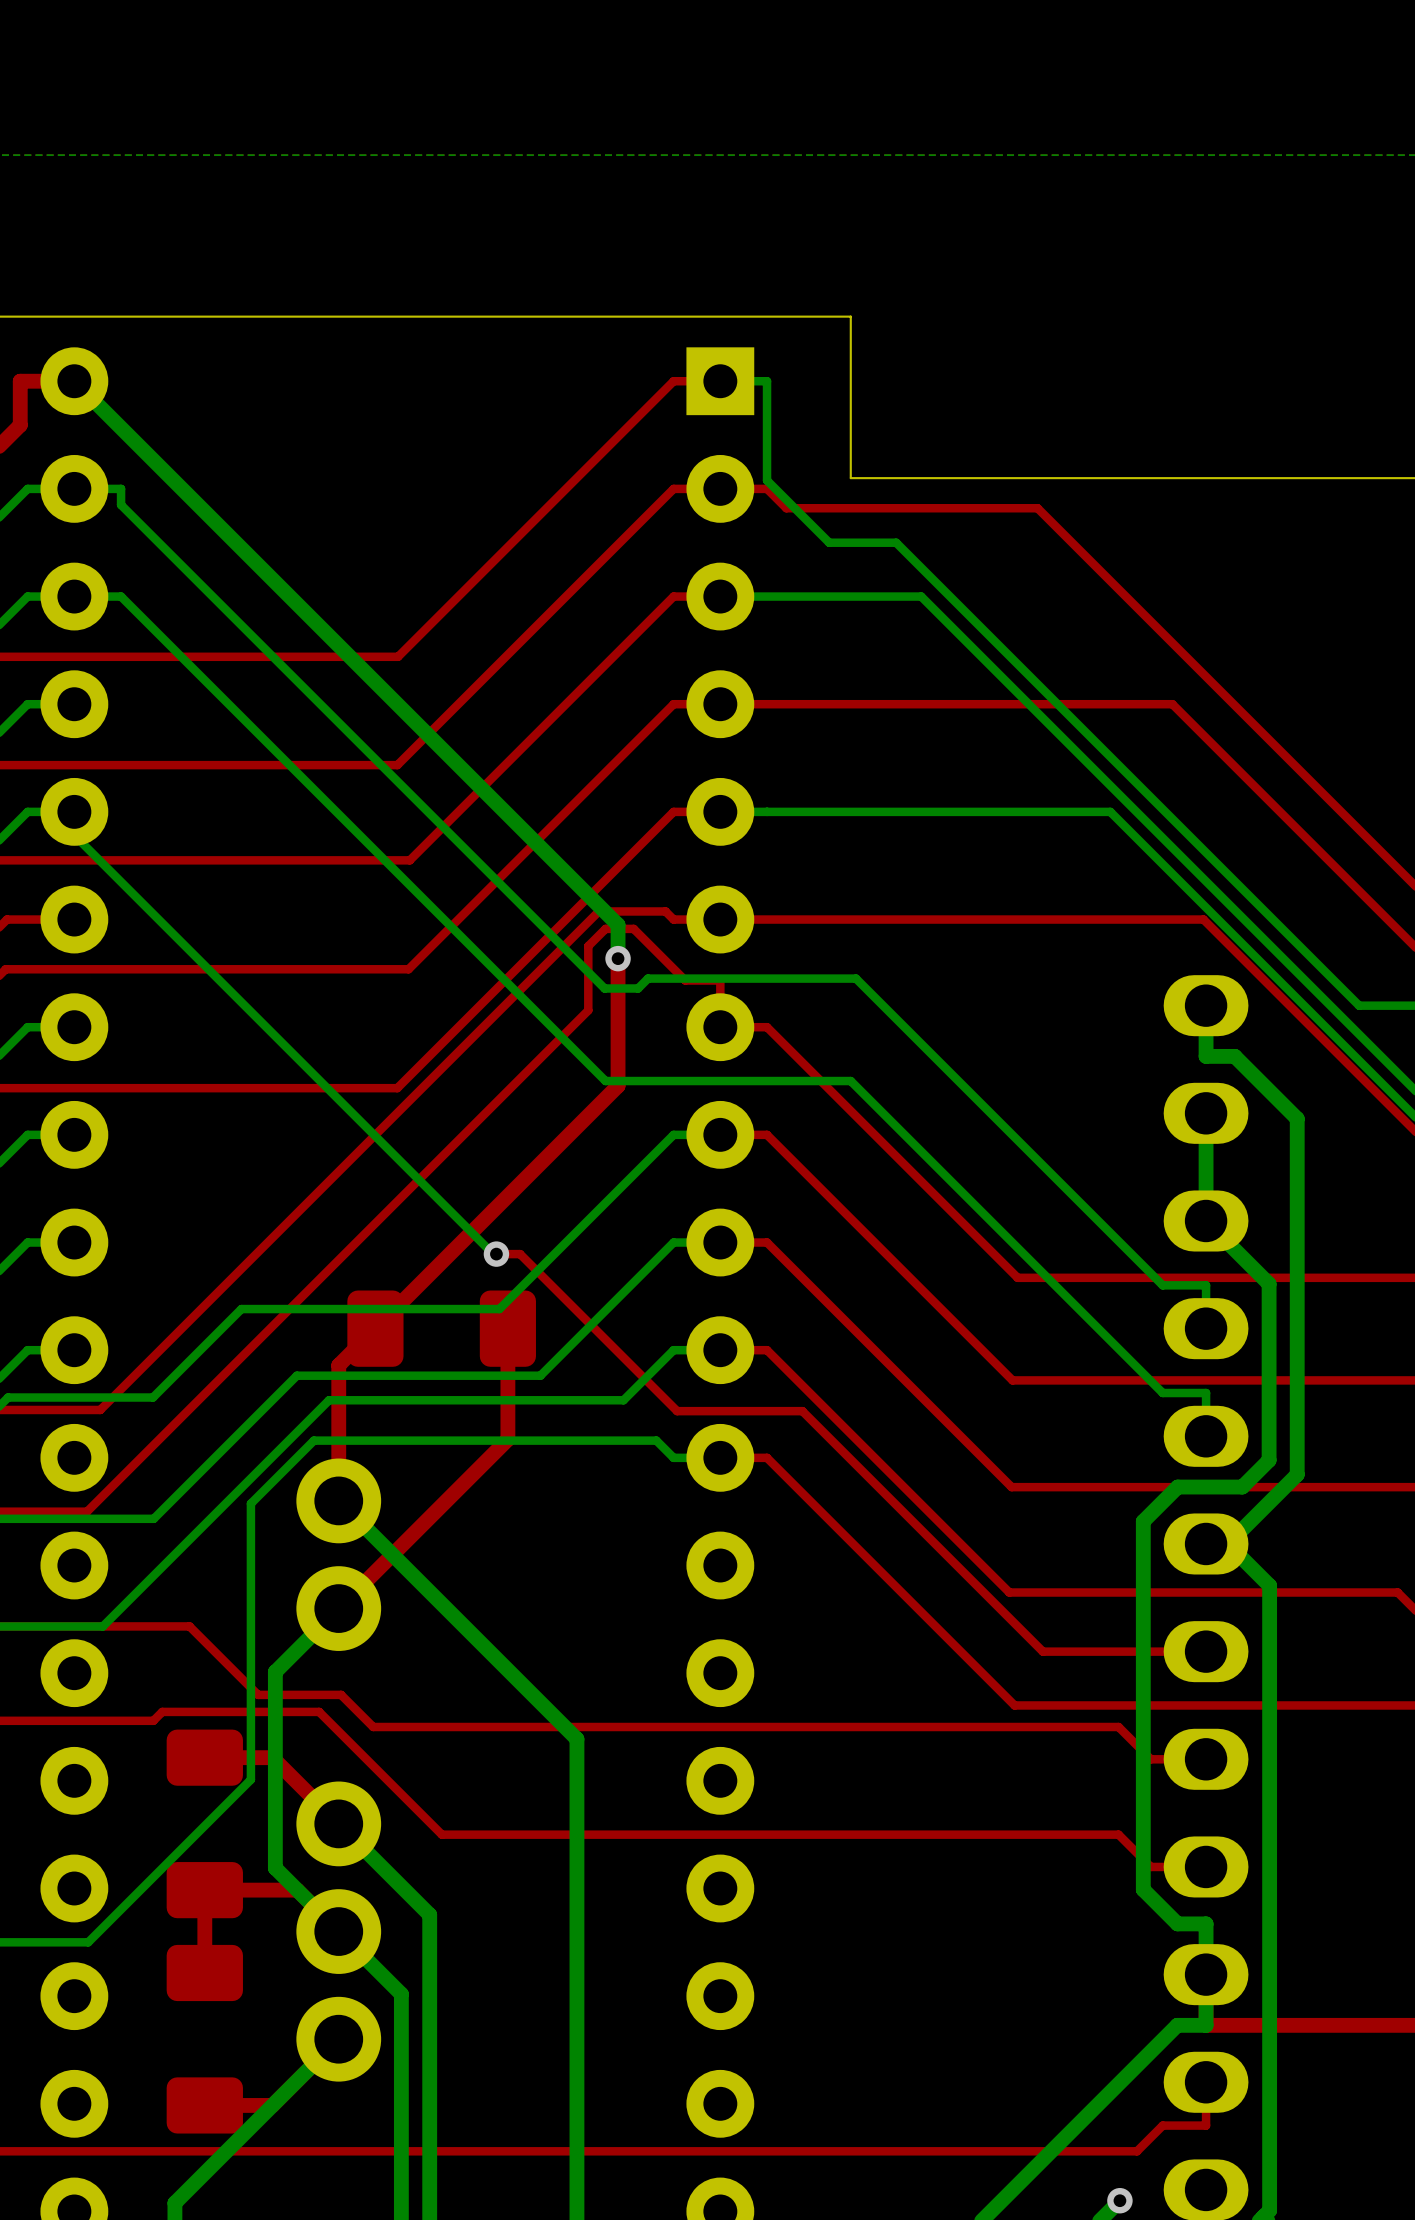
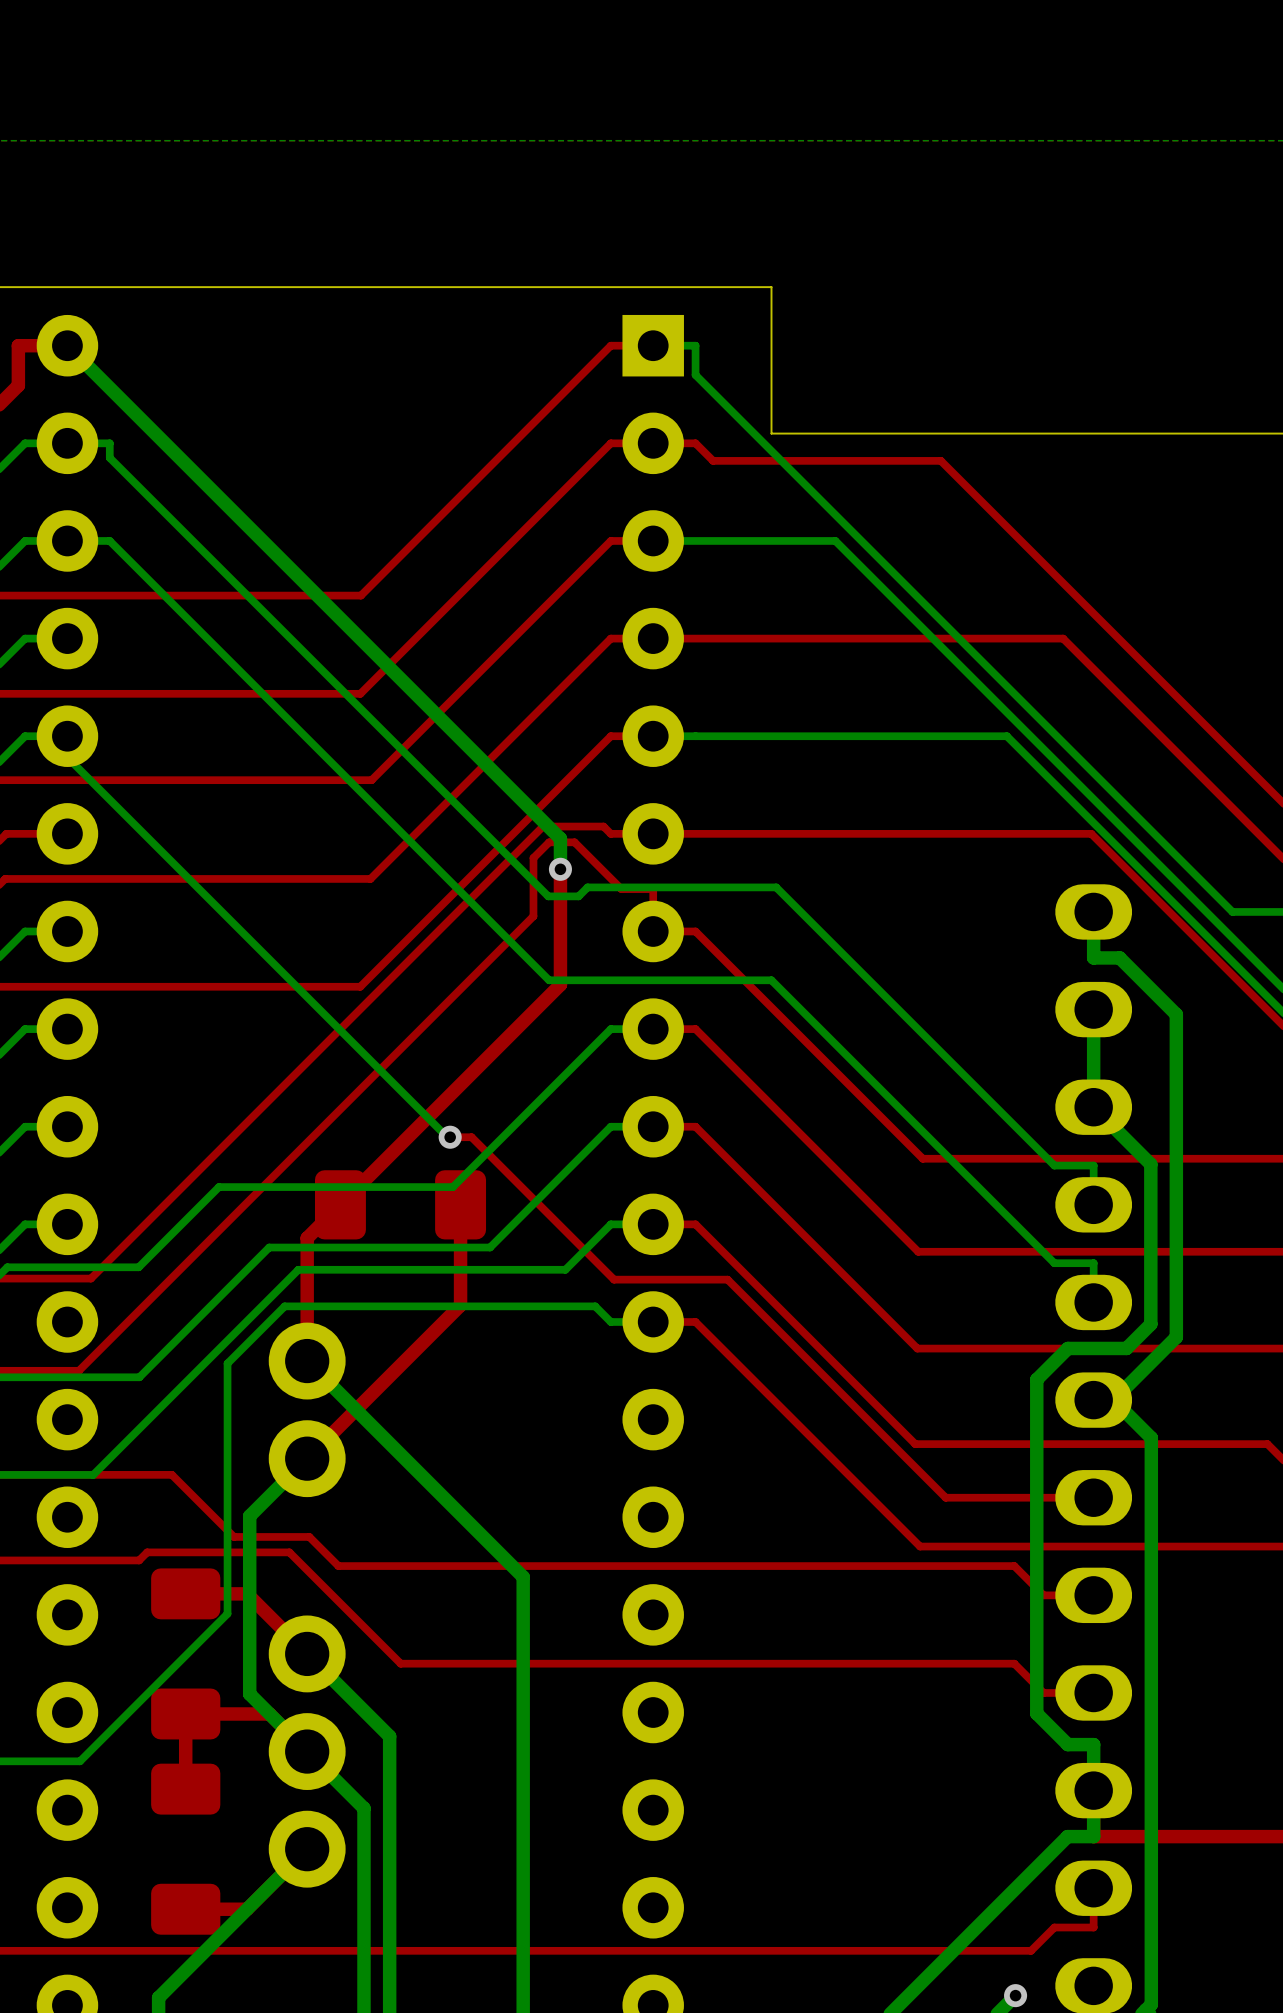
bottom track: (767, 413) (767, 480) (829, 542) (896, 542) -> (695, 375) (812, 492)

